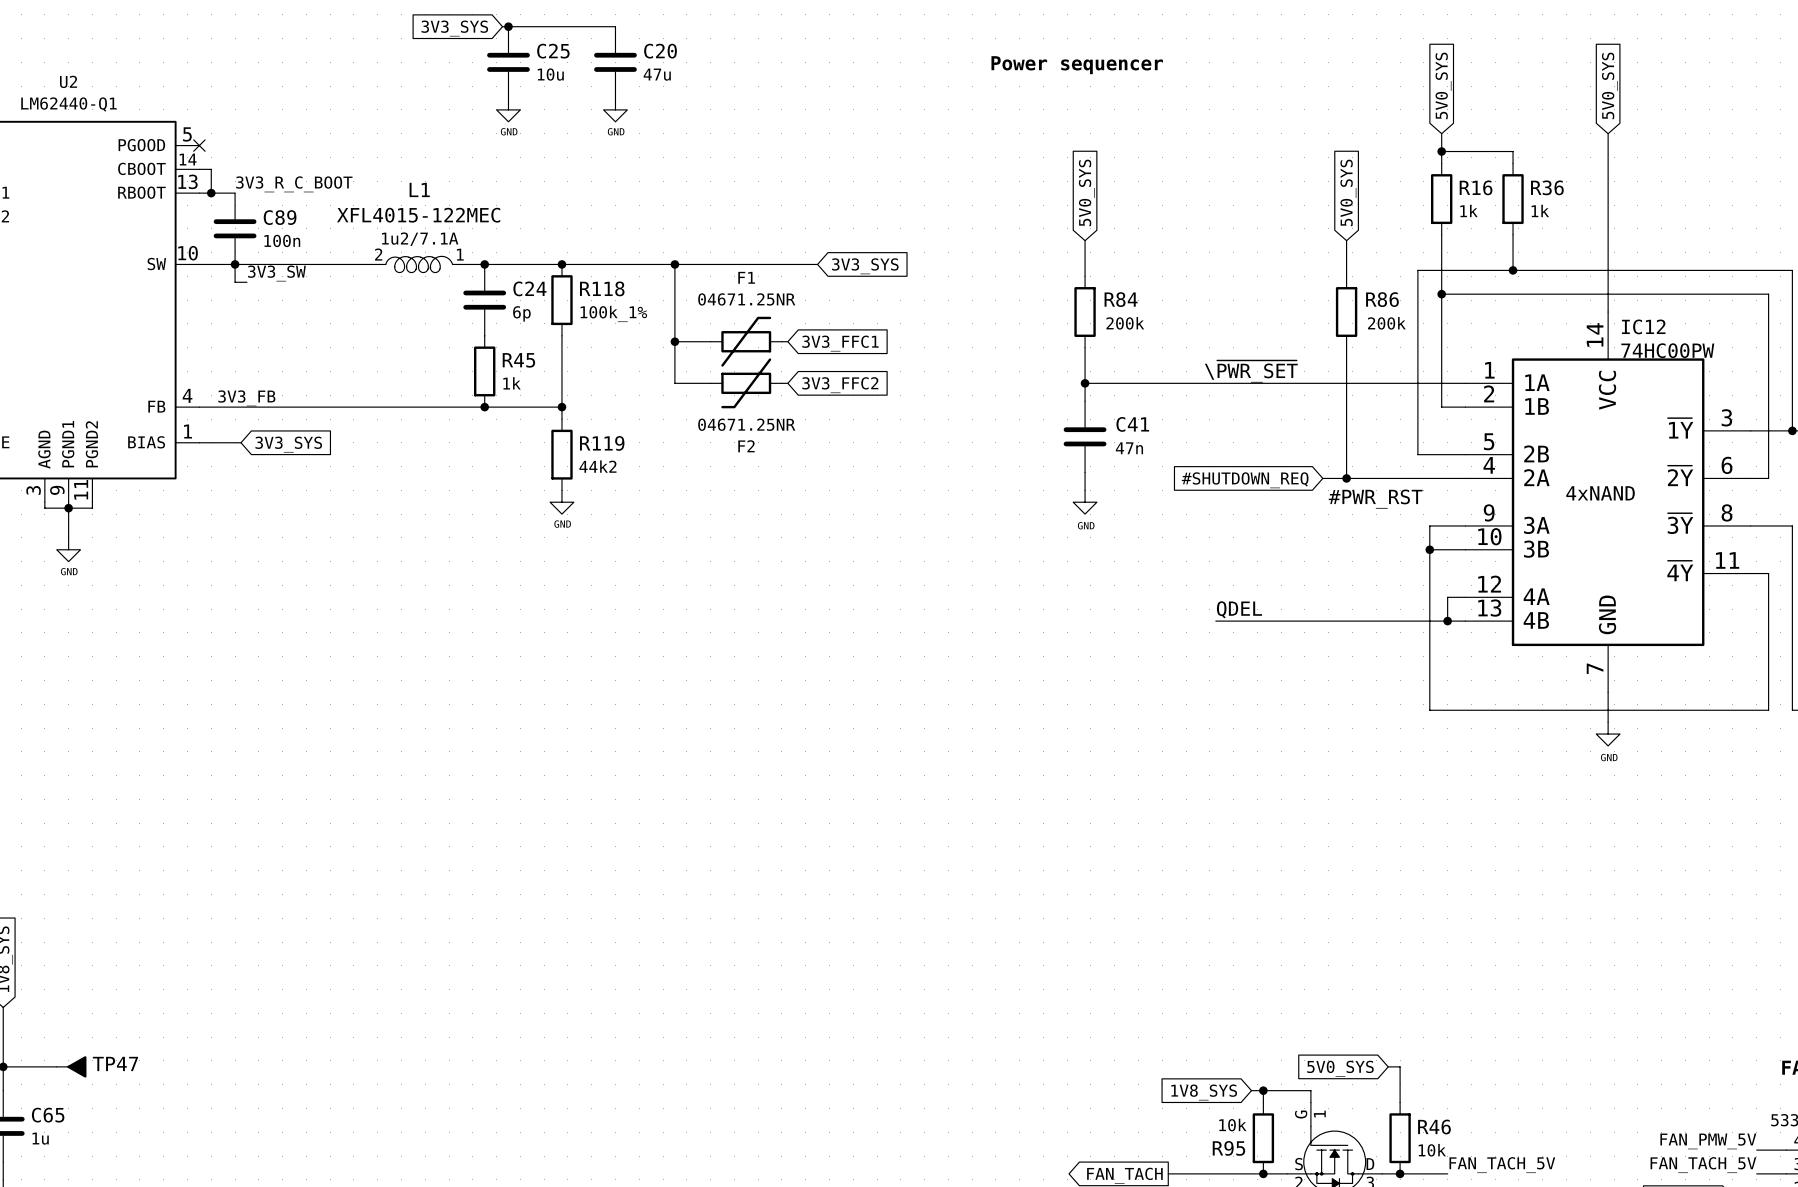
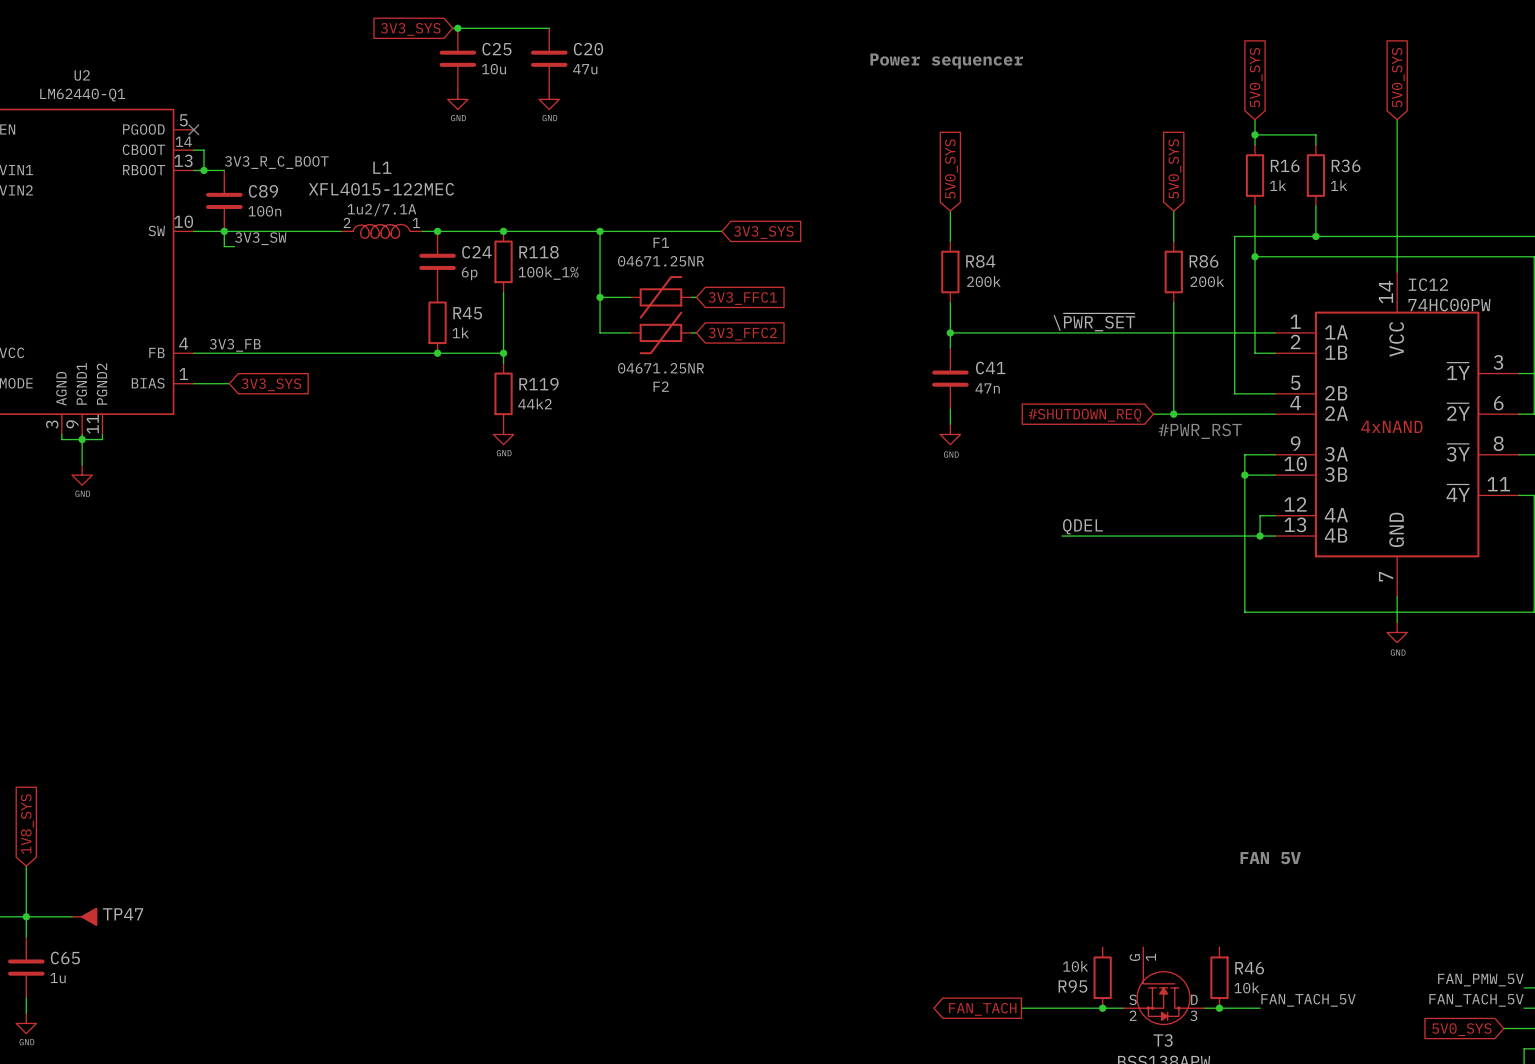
text: none -> FAN 5V (1270, 858)
wire: (1388, 1066) (1400, 1066) (1400, 1102) -> none
global label: 5V0_SYS (1340, 1068) -> none
wire: (1251, 1090) (1310, 1090) (1310, 1102) -> none
wire: (1263, 1090) (1263, 1102) -> none
junction: (1263, 1090) -> none
global label: 1V8_SYS (1204, 1092) -> none

